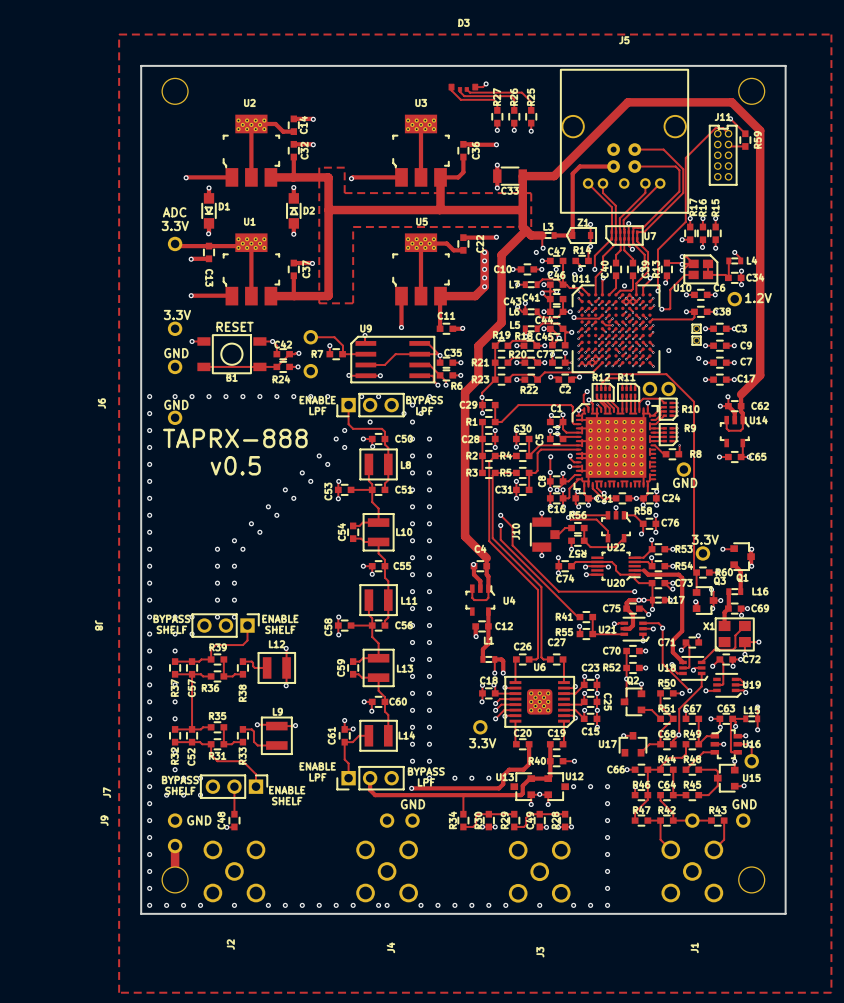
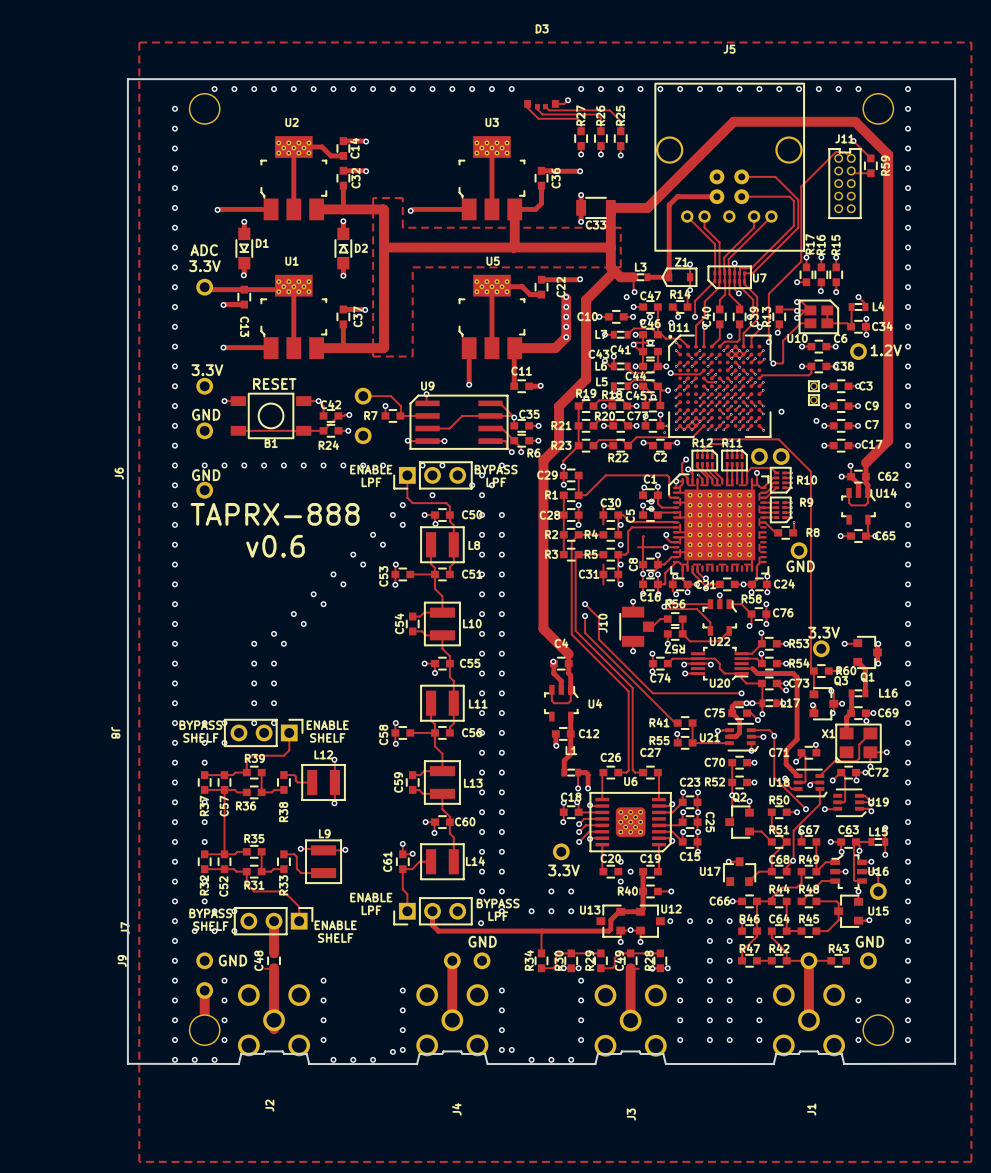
board edge: (141, 65) (141, 913) (785, 913) (785, 65) -> (165, 79) (127, 79) (127, 1063) (238, 1064) (241, 1053) (282, 1051) (284, 1053) (306, 1053) (309, 1064) (417, 1064) (419, 1053) (461, 1051) (462, 1053) (485, 1053) (487, 1064) (595, 1064) (597, 1053) (639, 1051) (640, 1053) (663, 1053) (665, 1064)
board edge: none -> (917, 79) (955, 79) (955, 1063) (844, 1063)
via: none -> (214, 89)
via: none -> (234, 89)
via: none -> (254, 89)
via: none -> (274, 89)
via: none -> (293, 89)
via: none -> (313, 89)
via: none -> (333, 89)
via: none -> (353, 89)
via: none -> (373, 89)
via: none -> (392, 89)
via: none -> (412, 89)
via: none -> (432, 89)
via: none -> (452, 89)
via: none -> (472, 89)
via: none -> (491, 89)
via: none -> (511, 89)
via: none -> (581, 89)
via: none -> (600, 89)
via: none -> (620, 89)
via: none -> (640, 89)
via: none -> (660, 89)
via: none -> (680, 89)
via: none -> (699, 89)
via: none -> (719, 89)
via: none -> (739, 89)
via: none -> (759, 89)
via: none -> (779, 89)
via: none -> (799, 89)
via: none -> (818, 89)
via: none -> (838, 89)
via: none -> (858, 89)
via: none -> (908, 89)
via: none -> (174, 108)
via: none -> (908, 108)
via: none -> (174, 128)
via: none -> (908, 128)
via: none -> (174, 148)
via: none -> (908, 148)
via: none -> (174, 168)
via: none -> (908, 168)
via: none -> (174, 188)
via: none -> (908, 188)
via: none -> (174, 207)
via: none -> (908, 207)
via: none -> (174, 227)
via: none -> (908, 227)
via: none -> (174, 247)
via: none -> (908, 247)
via: none -> (174, 267)
via: none -> (908, 267)
via: none -> (174, 287)
via: none -> (908, 287)
via: none -> (174, 306)
via: none -> (908, 306)
via: none -> (174, 326)
via: none -> (908, 326)
via: none -> (174, 346)
via: none -> (908, 346)
via: none -> (174, 366)
via: none -> (908, 366)
via: none -> (174, 386)
via: none -> (908, 386)
via: none -> (174, 406)
via: none -> (908, 406)
via: none -> (174, 425)
via: none -> (908, 425)
via: none -> (174, 445)
via: none -> (908, 445)
via: none -> (908, 465)
via: none -> (908, 485)
via: (516, 430) -> none
via: none -> (908, 505)
track: (578, 445) (539, 445) (529, 455) -> (676, 522) (630, 521) (623, 515) (618, 515)
via: (516, 447) -> none
via: none -> (620, 524)
via: none -> (908, 524)
via: (550, 456) -> none
via: none -> (620, 544)
via: none -> (908, 544)
text: v0.5 (235, 465) -> v0.6 (275, 546)
track: none -> (638, 547) (665, 547)
via: (550, 472) -> none
via: (516, 481) -> none
via: none -> (620, 564)
via: none -> (908, 564)
track: none -> (618, 574) (618, 581) (620, 584)
via: (516, 498) -> none
via: none -> (620, 584)
via: none -> (908, 584)
via: none -> (908, 604)
via: none -> (908, 623)
via: none -> (908, 643)
via: none -> (908, 663)
via: none -> (908, 683)
via: none -> (908, 703)
via: none -> (908, 723)
via: none -> (908, 742)
via: none -> (908, 762)
via: none -> (908, 782)
via: none -> (908, 802)
via: none -> (908, 822)
via: none -> (908, 841)
via: none -> (620, 861)
via: none -> (908, 861)
track: (529, 744) (529, 764) (523, 769) (509, 769) (503, 775) (503, 784) (499, 788) (411, 788) -> none
via: none -> (630, 871)
via: none -> (620, 881)
via: none -> (908, 881)
via: none -> (551, 891)
via: none -> (571, 891)
via: none -> (908, 901)
track width: thin (234, 786) (234, 814) -> thick (274, 921) (274, 953)
via: none -> (729, 921)
via: none -> (908, 921)
via: none -> (729, 940)
via: none -> (908, 940)
track: none -> (452, 960) (452, 1023)
via: none -> (729, 960)
track: (660, 820) (660, 839) (670, 849) -> none
track: none -> (808, 960) (808, 1020) (806, 1022)
track: (724, 820) (724, 839) (713, 849) -> none
via: none -> (908, 960)
track: none -> (274, 968) (274, 1029)
track: none -> (630, 968) (630, 1024)
via: (226, 827) -> none
via: (546, 827) -> none
via: none -> (224, 980)
via: none -> (323, 980)
via: none -> (581, 980)
via: none -> (680, 980)
via: none -> (729, 980)
via: none -> (908, 980)
via: none -> (402, 990)
via: none -> (501, 990)
via: none -> (224, 1000)
via: none -> (323, 1000)
via: none -> (581, 1000)
via: none -> (680, 1000)
via: none -> (729, 1000)
via: none -> (759, 1000)
via: none -> (858, 1000)
via: none -> (908, 1000)
via: none -> (402, 1010)
via: none -> (501, 1010)
via: none -> (224, 1020)
via: none -> (323, 1020)
via: none -> (581, 1020)
via: none -> (680, 1020)
via: none -> (729, 1020)
via: none -> (759, 1020)
via: none -> (858, 1020)
via: none -> (908, 1020)
via: none -> (402, 1030)
via: none -> (501, 1030)
via: none -> (224, 1040)
via: none -> (323, 1040)
via: none -> (581, 1040)
via: none -> (680, 1040)
via: none -> (729, 1040)
via: none -> (759, 1040)
via: none -> (858, 1040)
via: none -> (908, 1040)
via: none -> (402, 1049)
via: none -> (501, 1049)
via: none -> (511, 1049)
via: none -> (392, 1051)
via: (200, 905) -> none
via: (234, 905) -> none
via: (268, 905) -> none
via: (336, 905) -> none
via: (353, 905) -> none
via: (378, 905) -> none
via: (387, 905) -> none
via: (421, 905) -> none
via: (437, 905) -> none
via: (505, 905) -> none
via: (539, 905) -> none
via: (573, 905) -> none
via: (590, 905) -> none
via: (607, 905) -> none
board edge: none -> (665, 1063) (773, 1064) (776, 1053) (817, 1051) (819, 1053) (841, 1053) (844, 1064)

